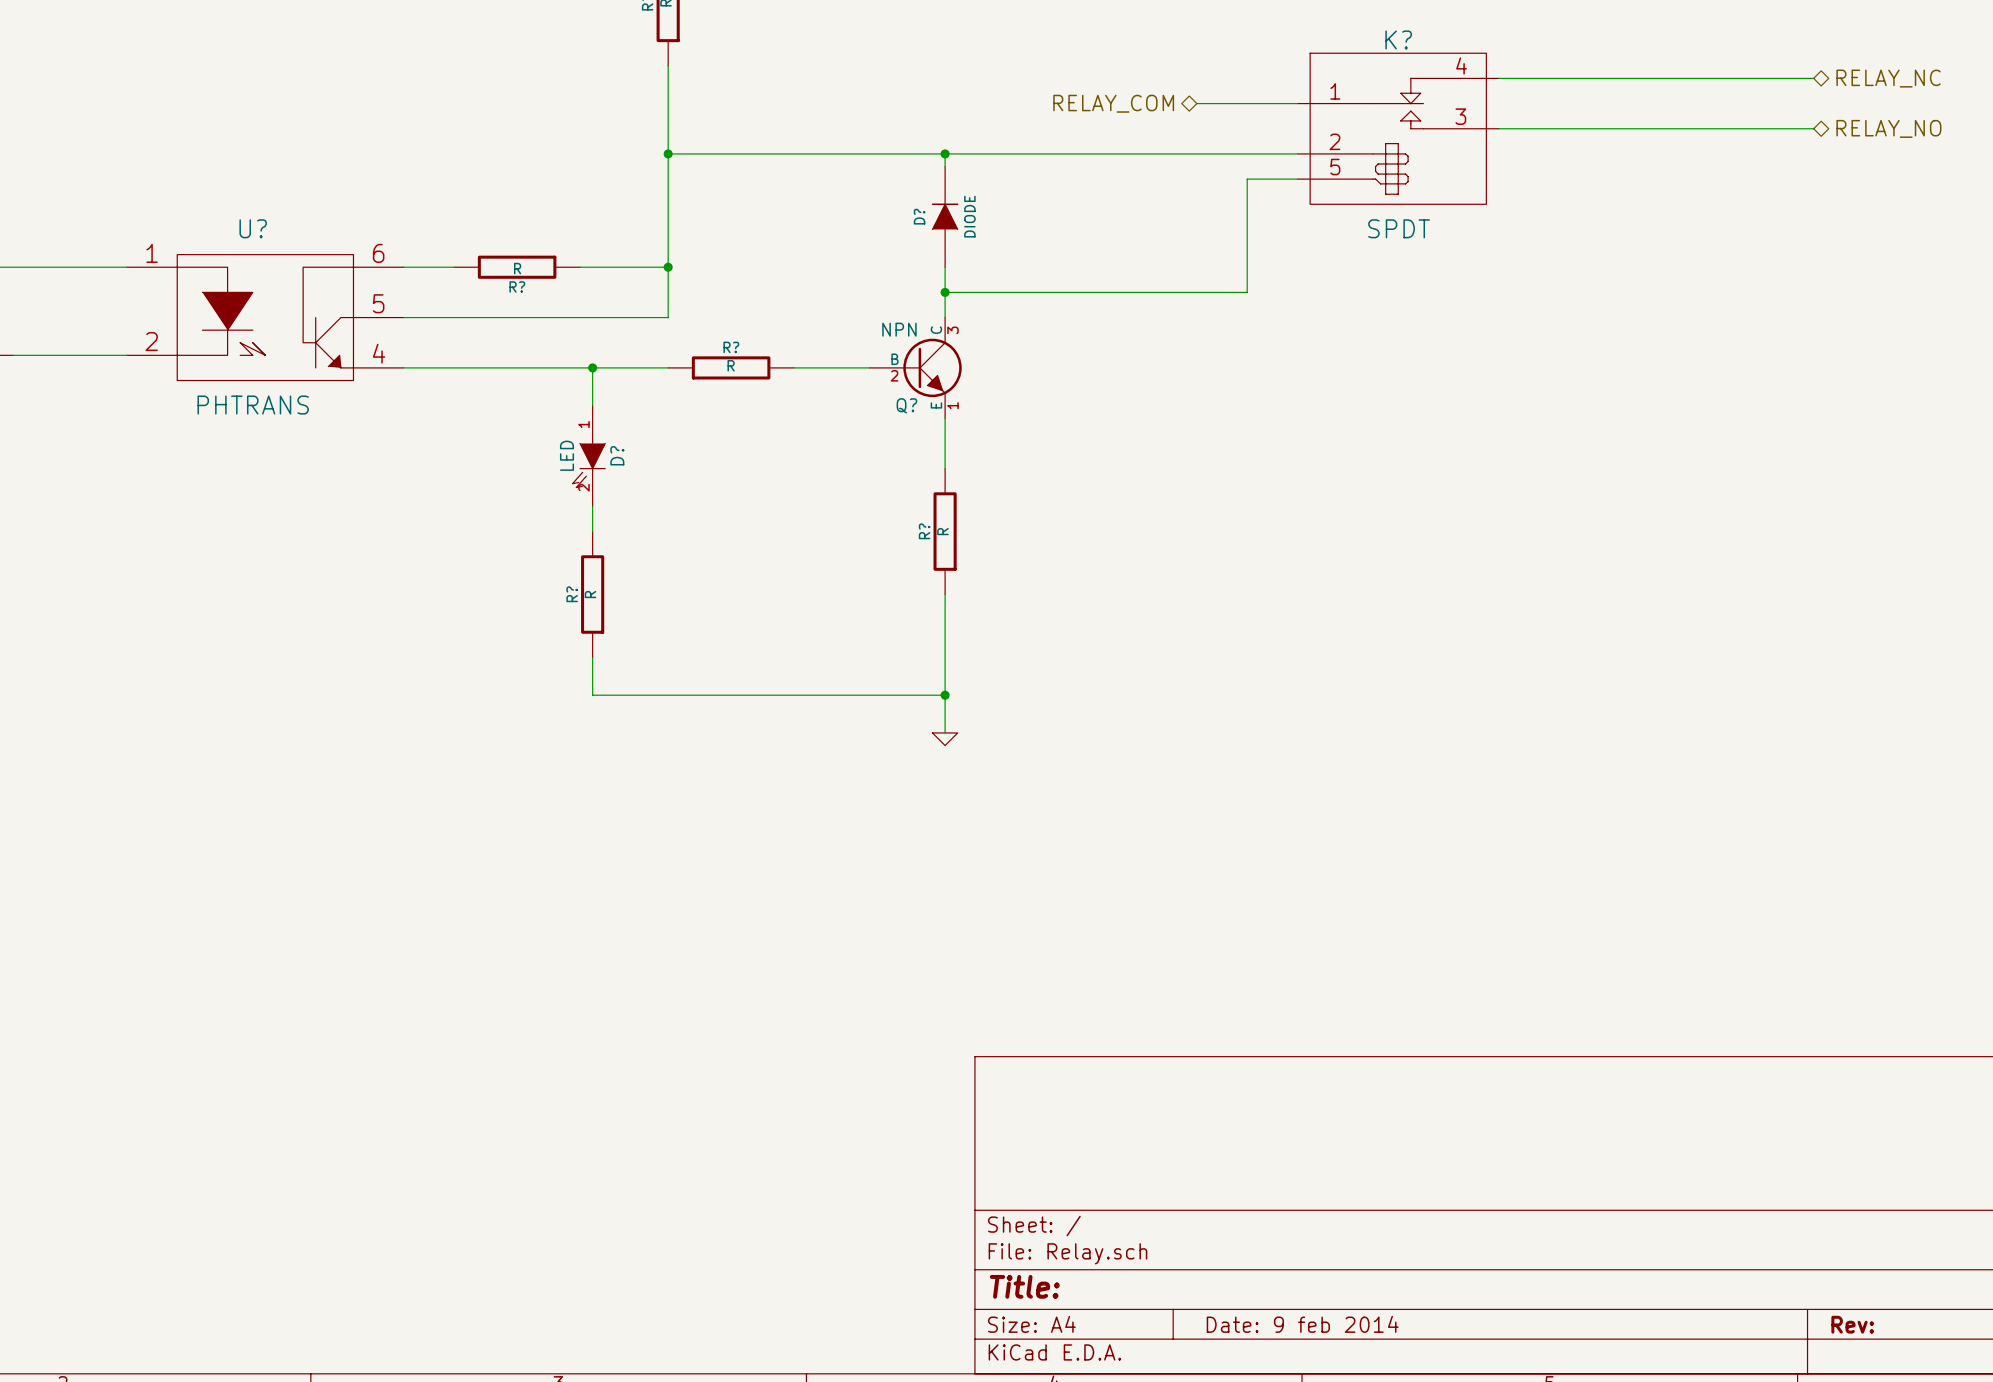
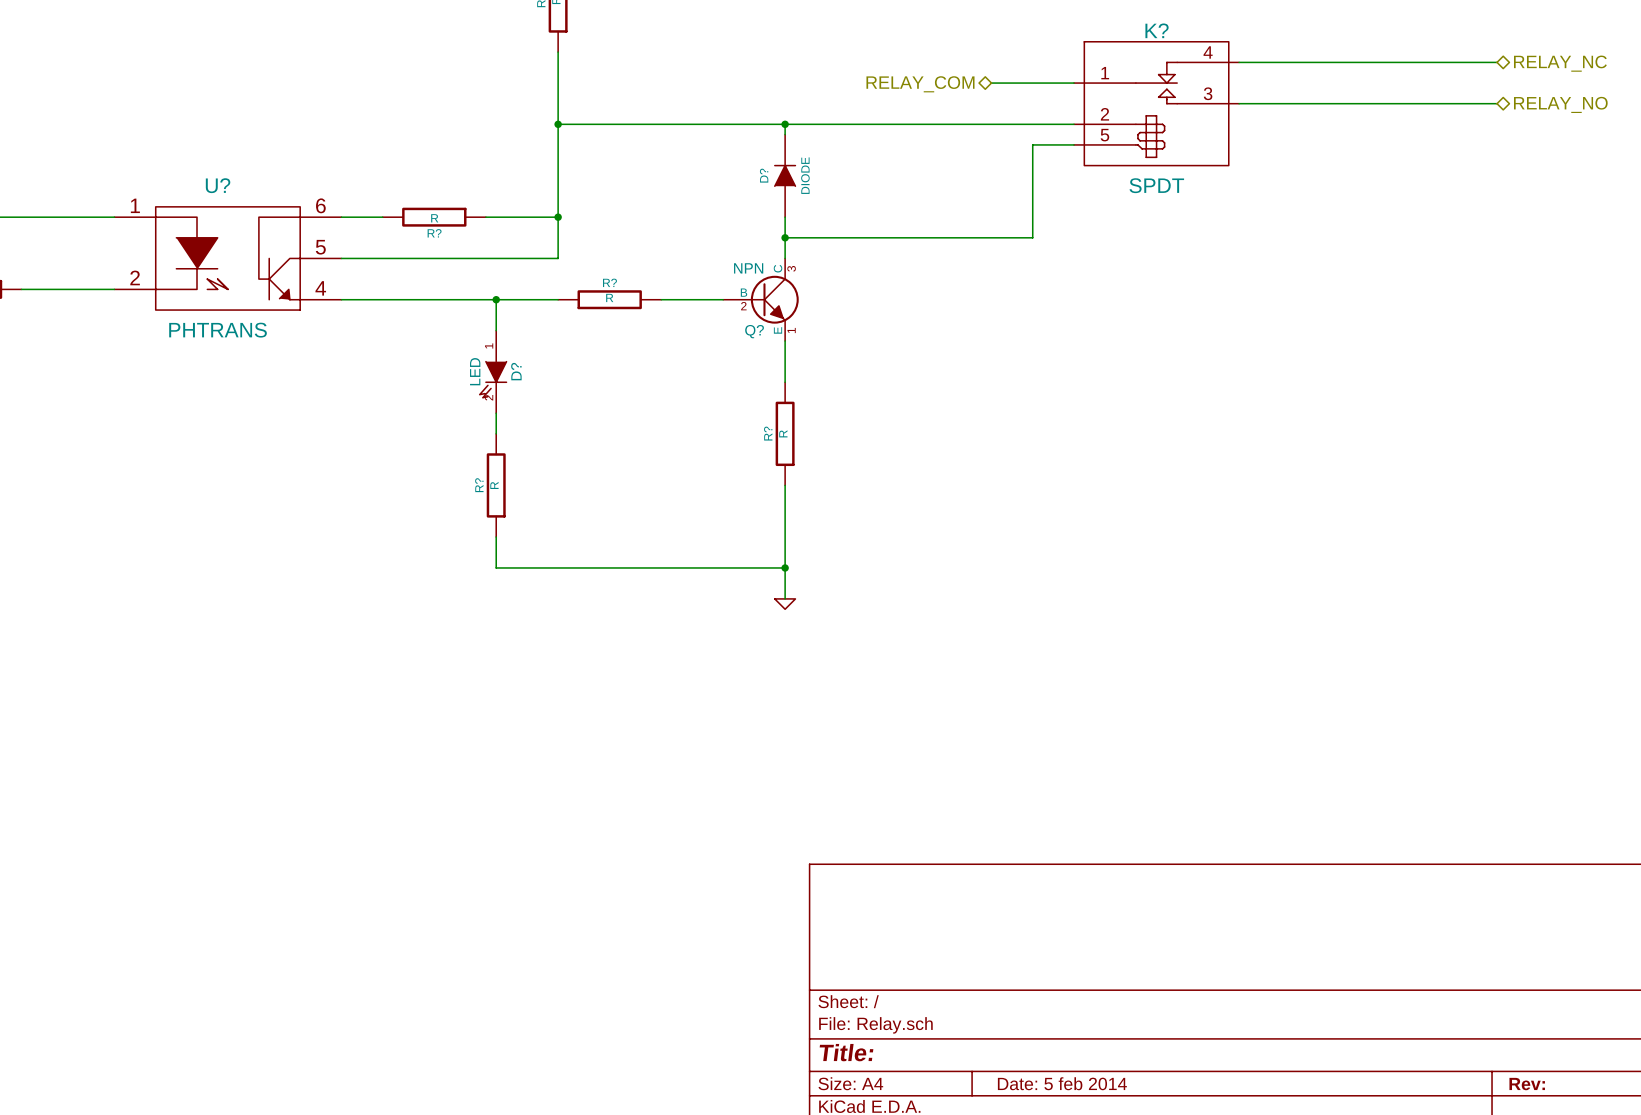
title block: Date: 9 feb 2014 (1302, 1324) -> Date: 5 feb 2014 (1062, 1083)

